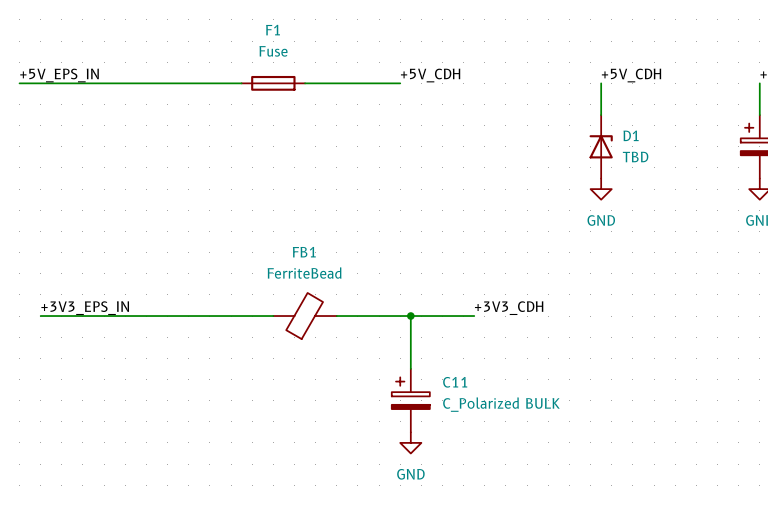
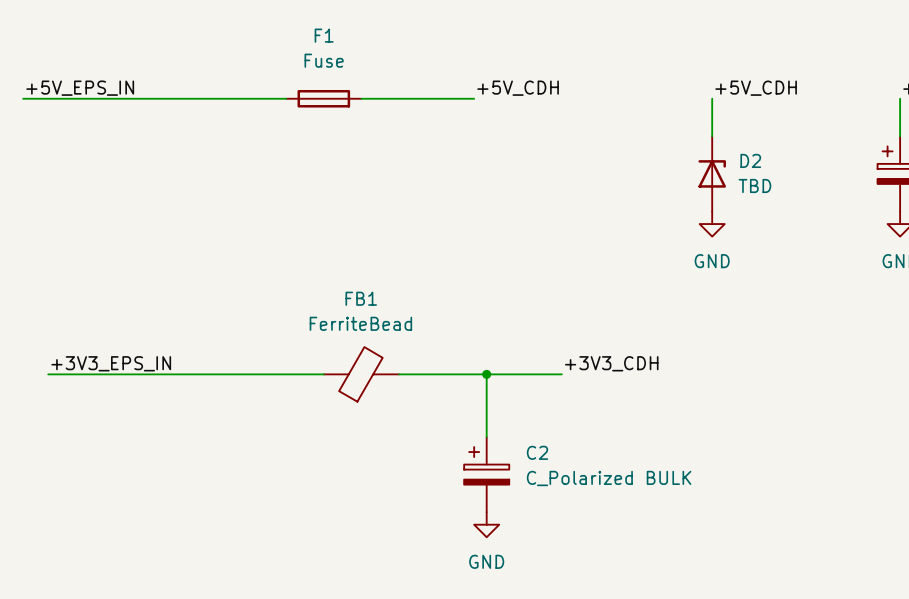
D1 name: D1 (631, 135) -> D2 (750, 160)
C11 name: C11 (455, 382) -> C2 (537, 452)

